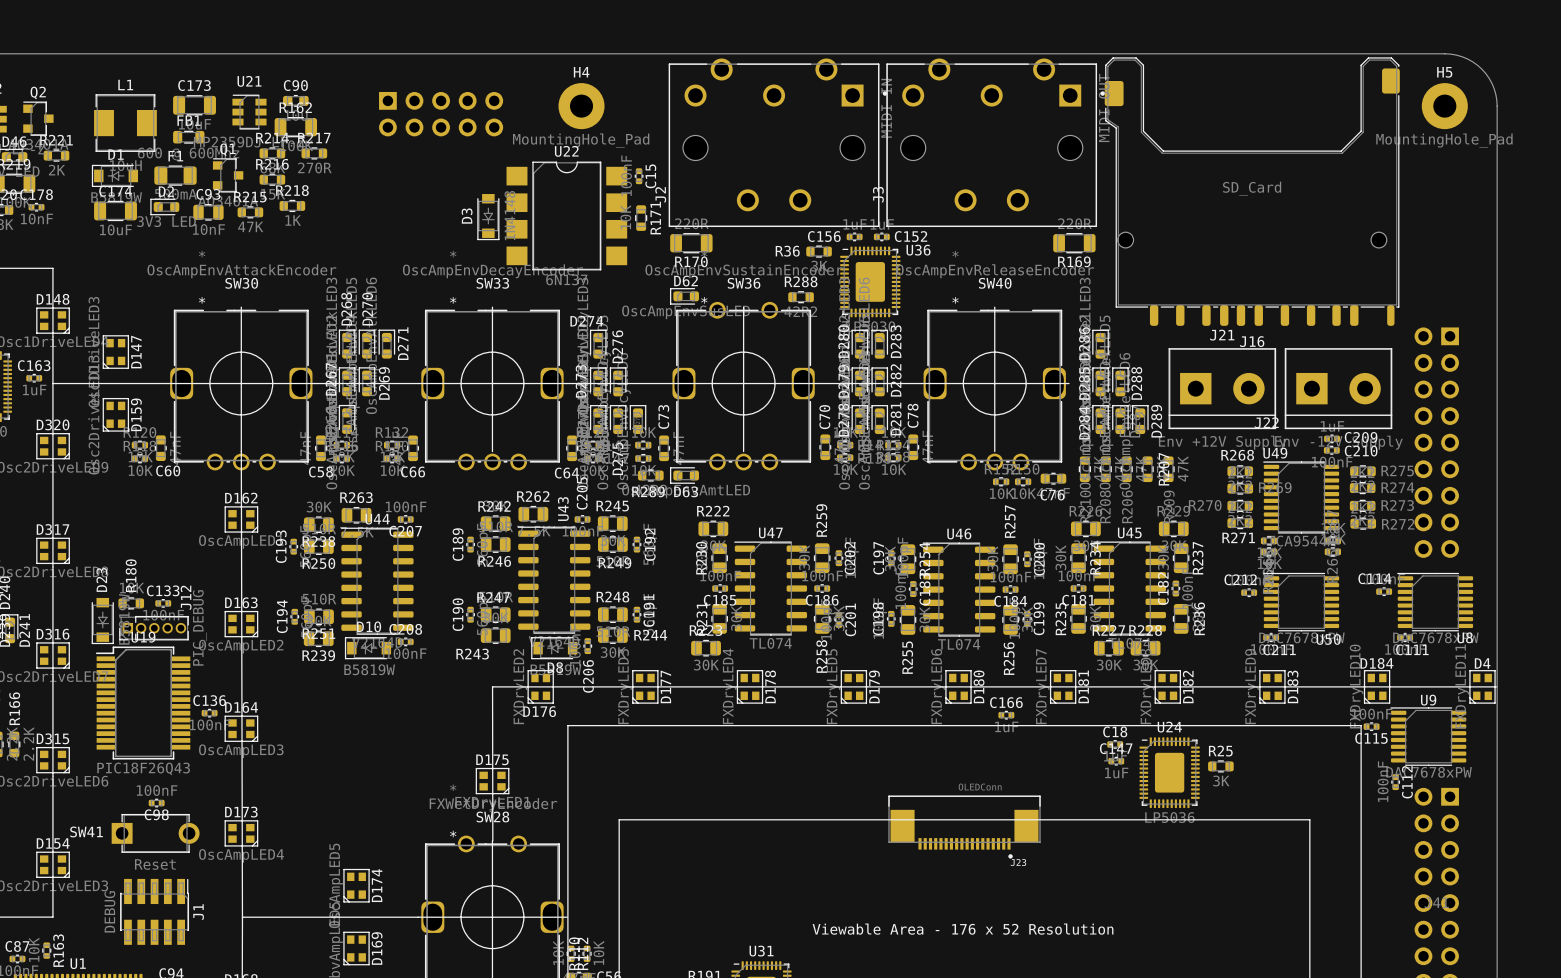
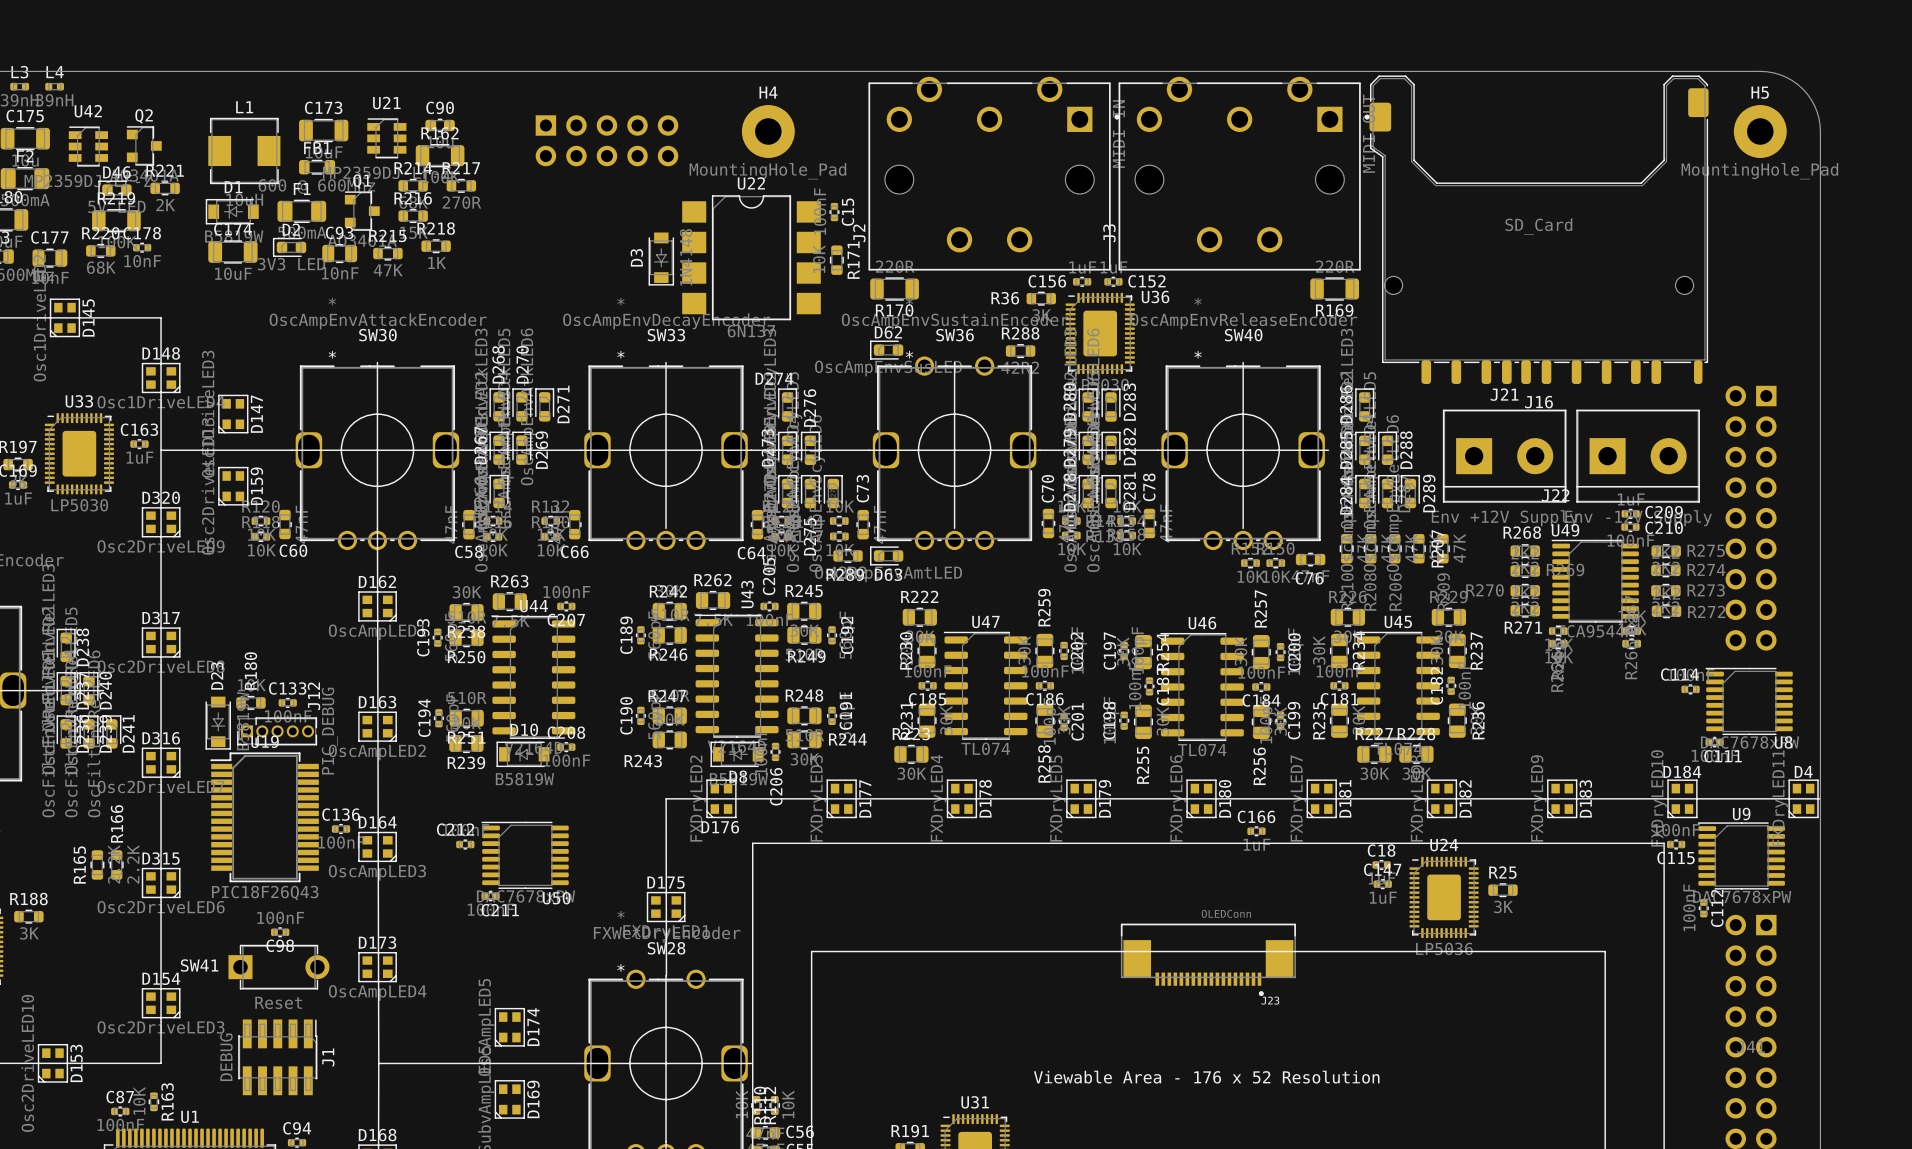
C212 position: (1249, 592) -> (465, 844)
U50 position: (1301, 602) -> (525, 855)
C211 position: (1271, 637) -> (490, 896)

